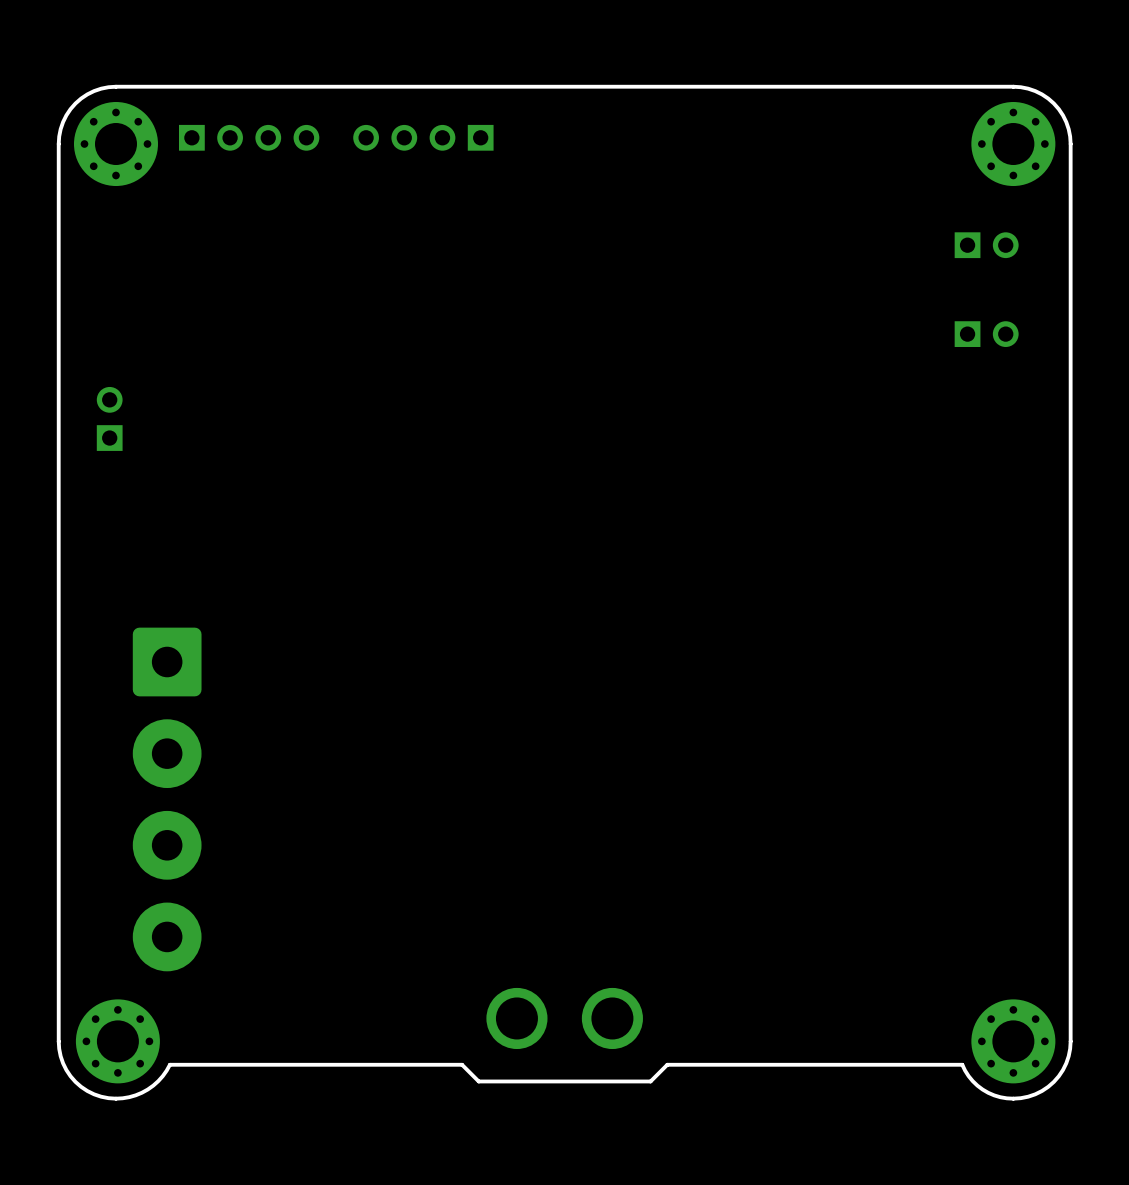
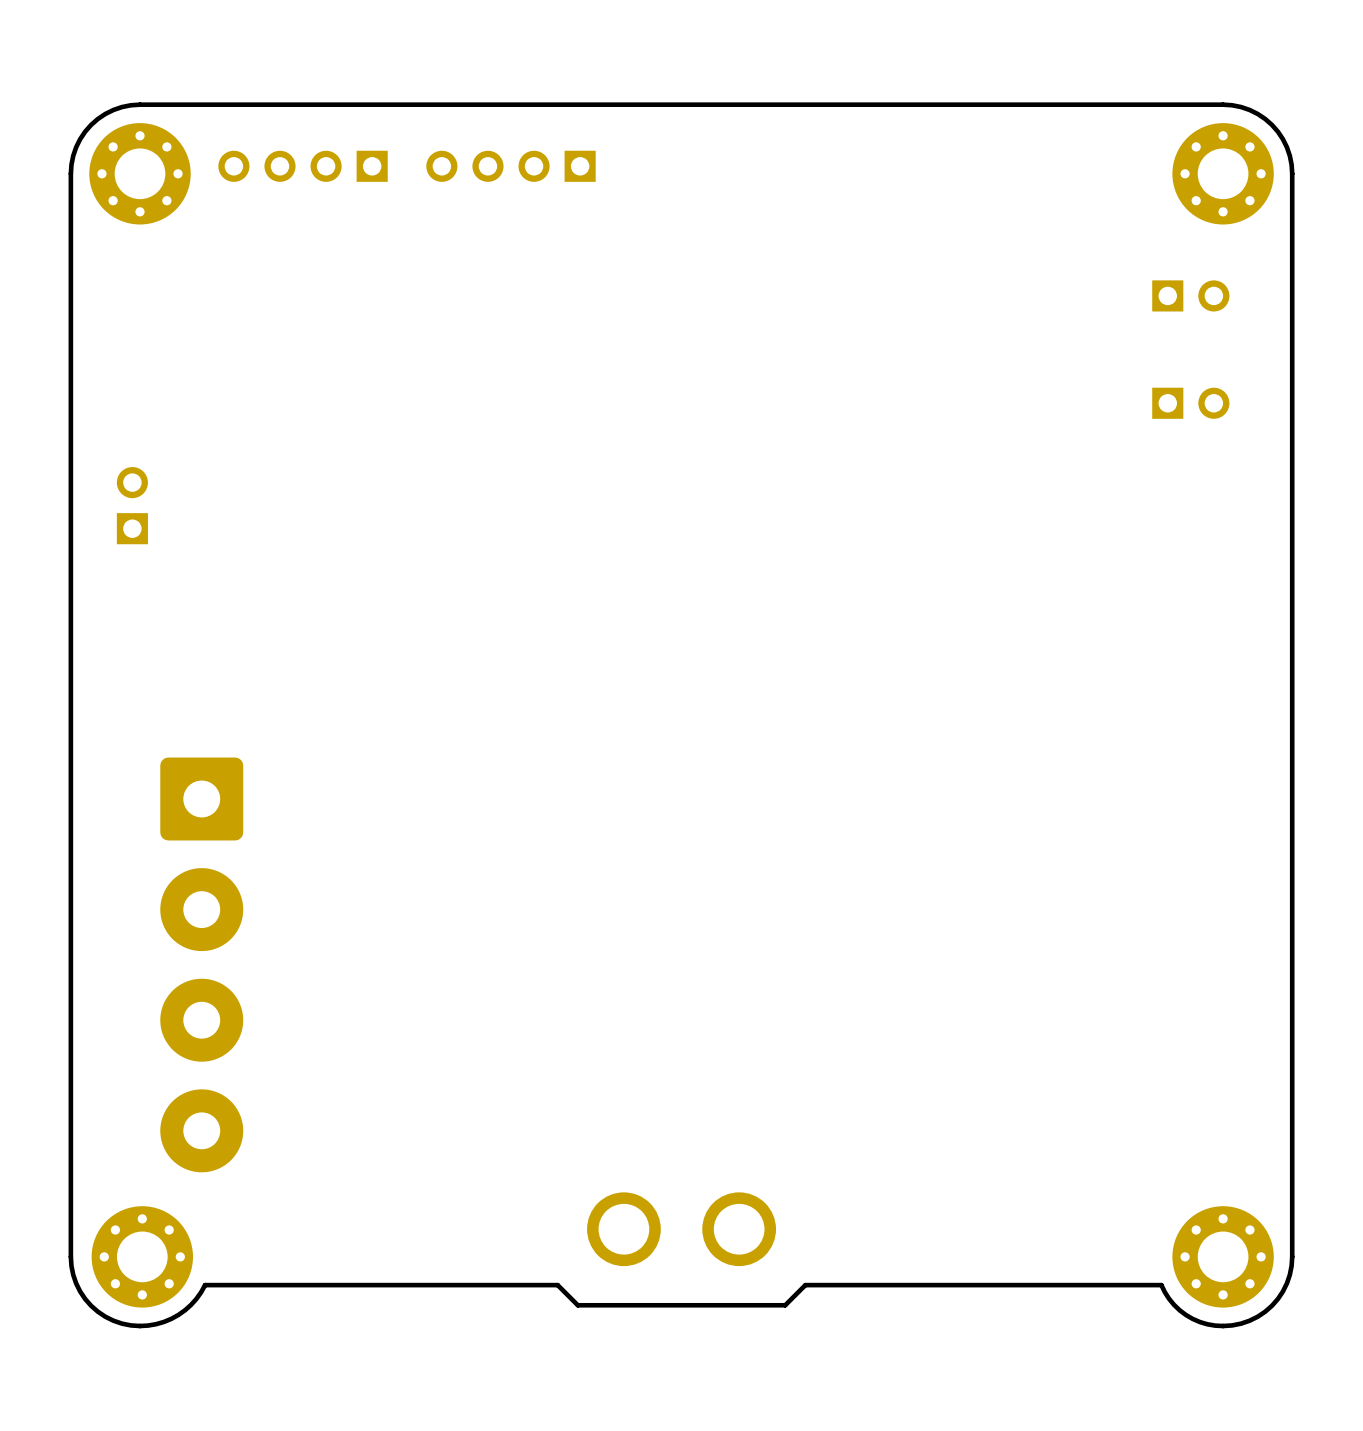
part rotation: 0° (249, 137) -> 180° (303, 166)

